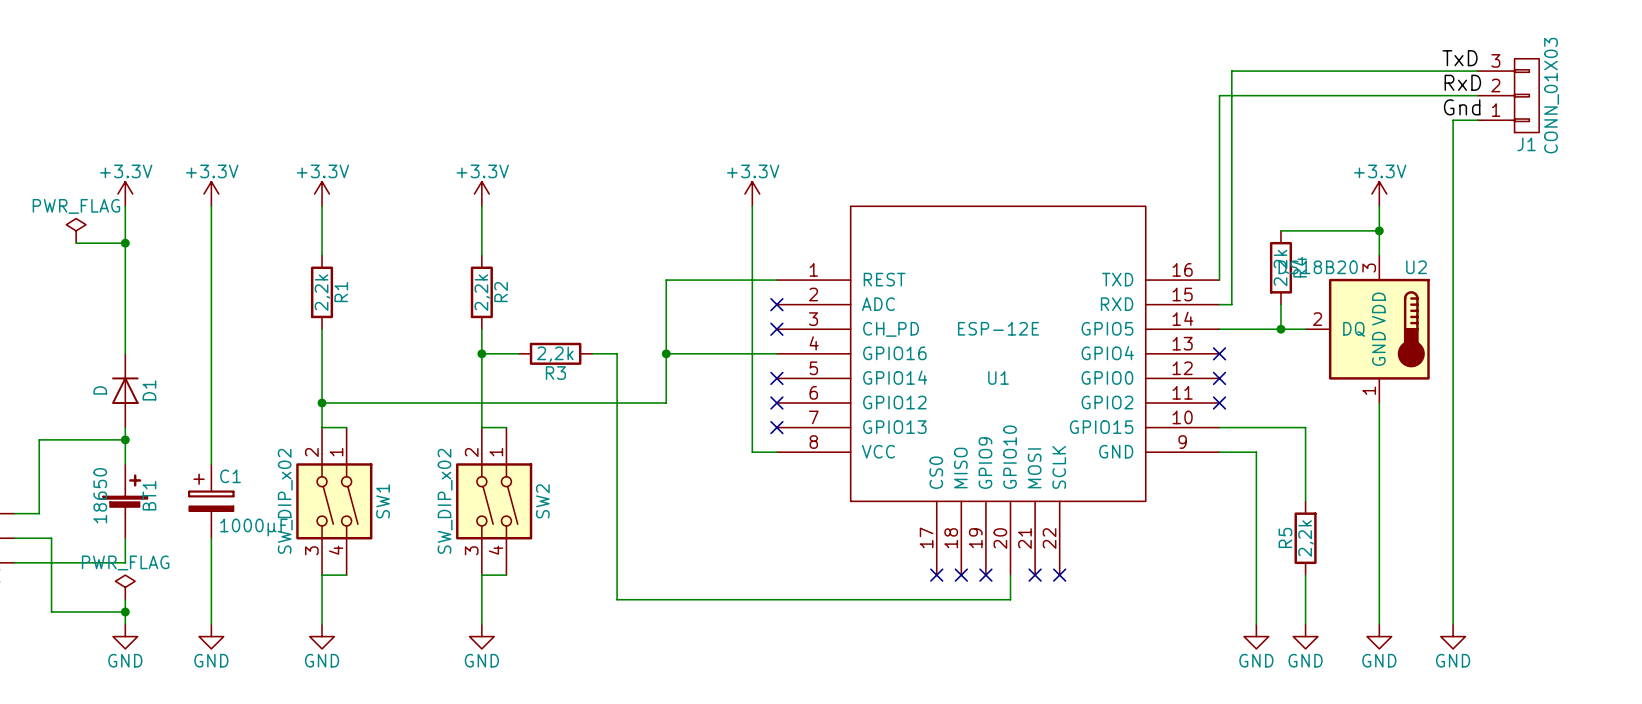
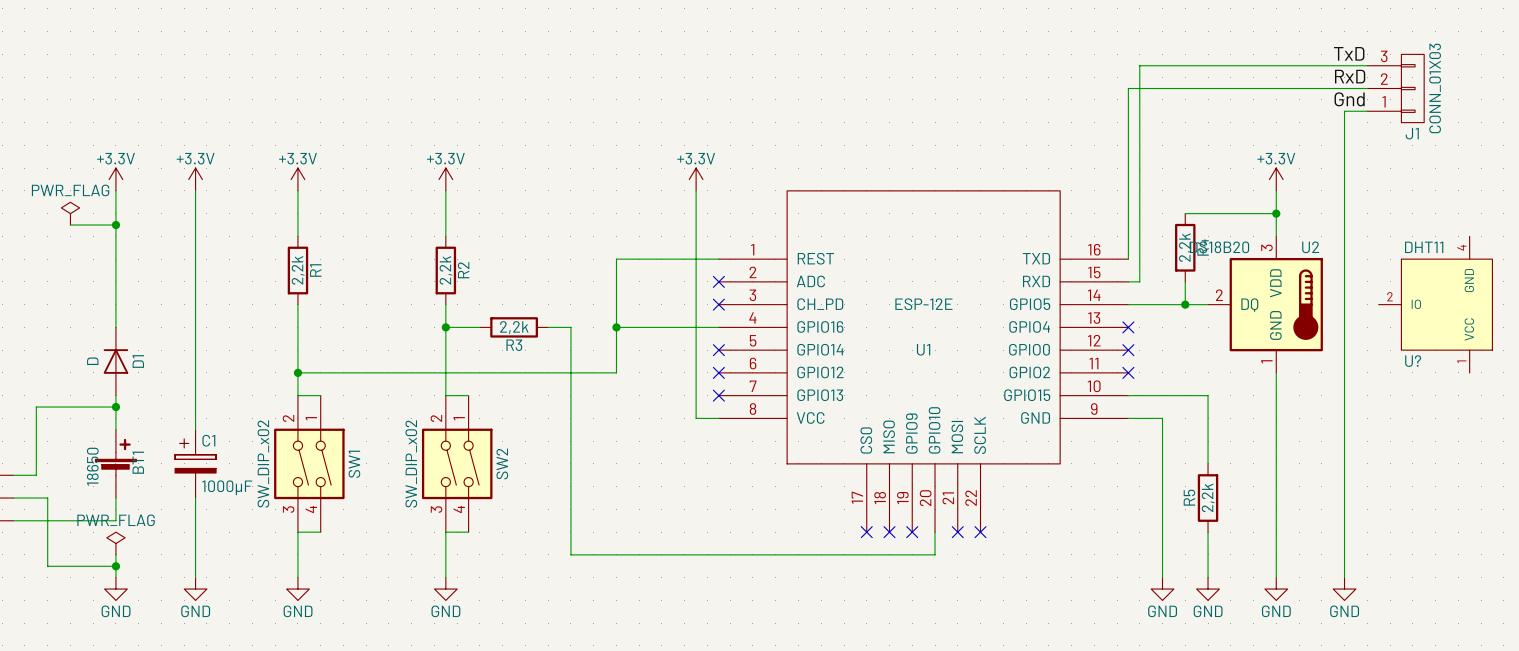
U?: none -> DHT11 (1435, 304)

